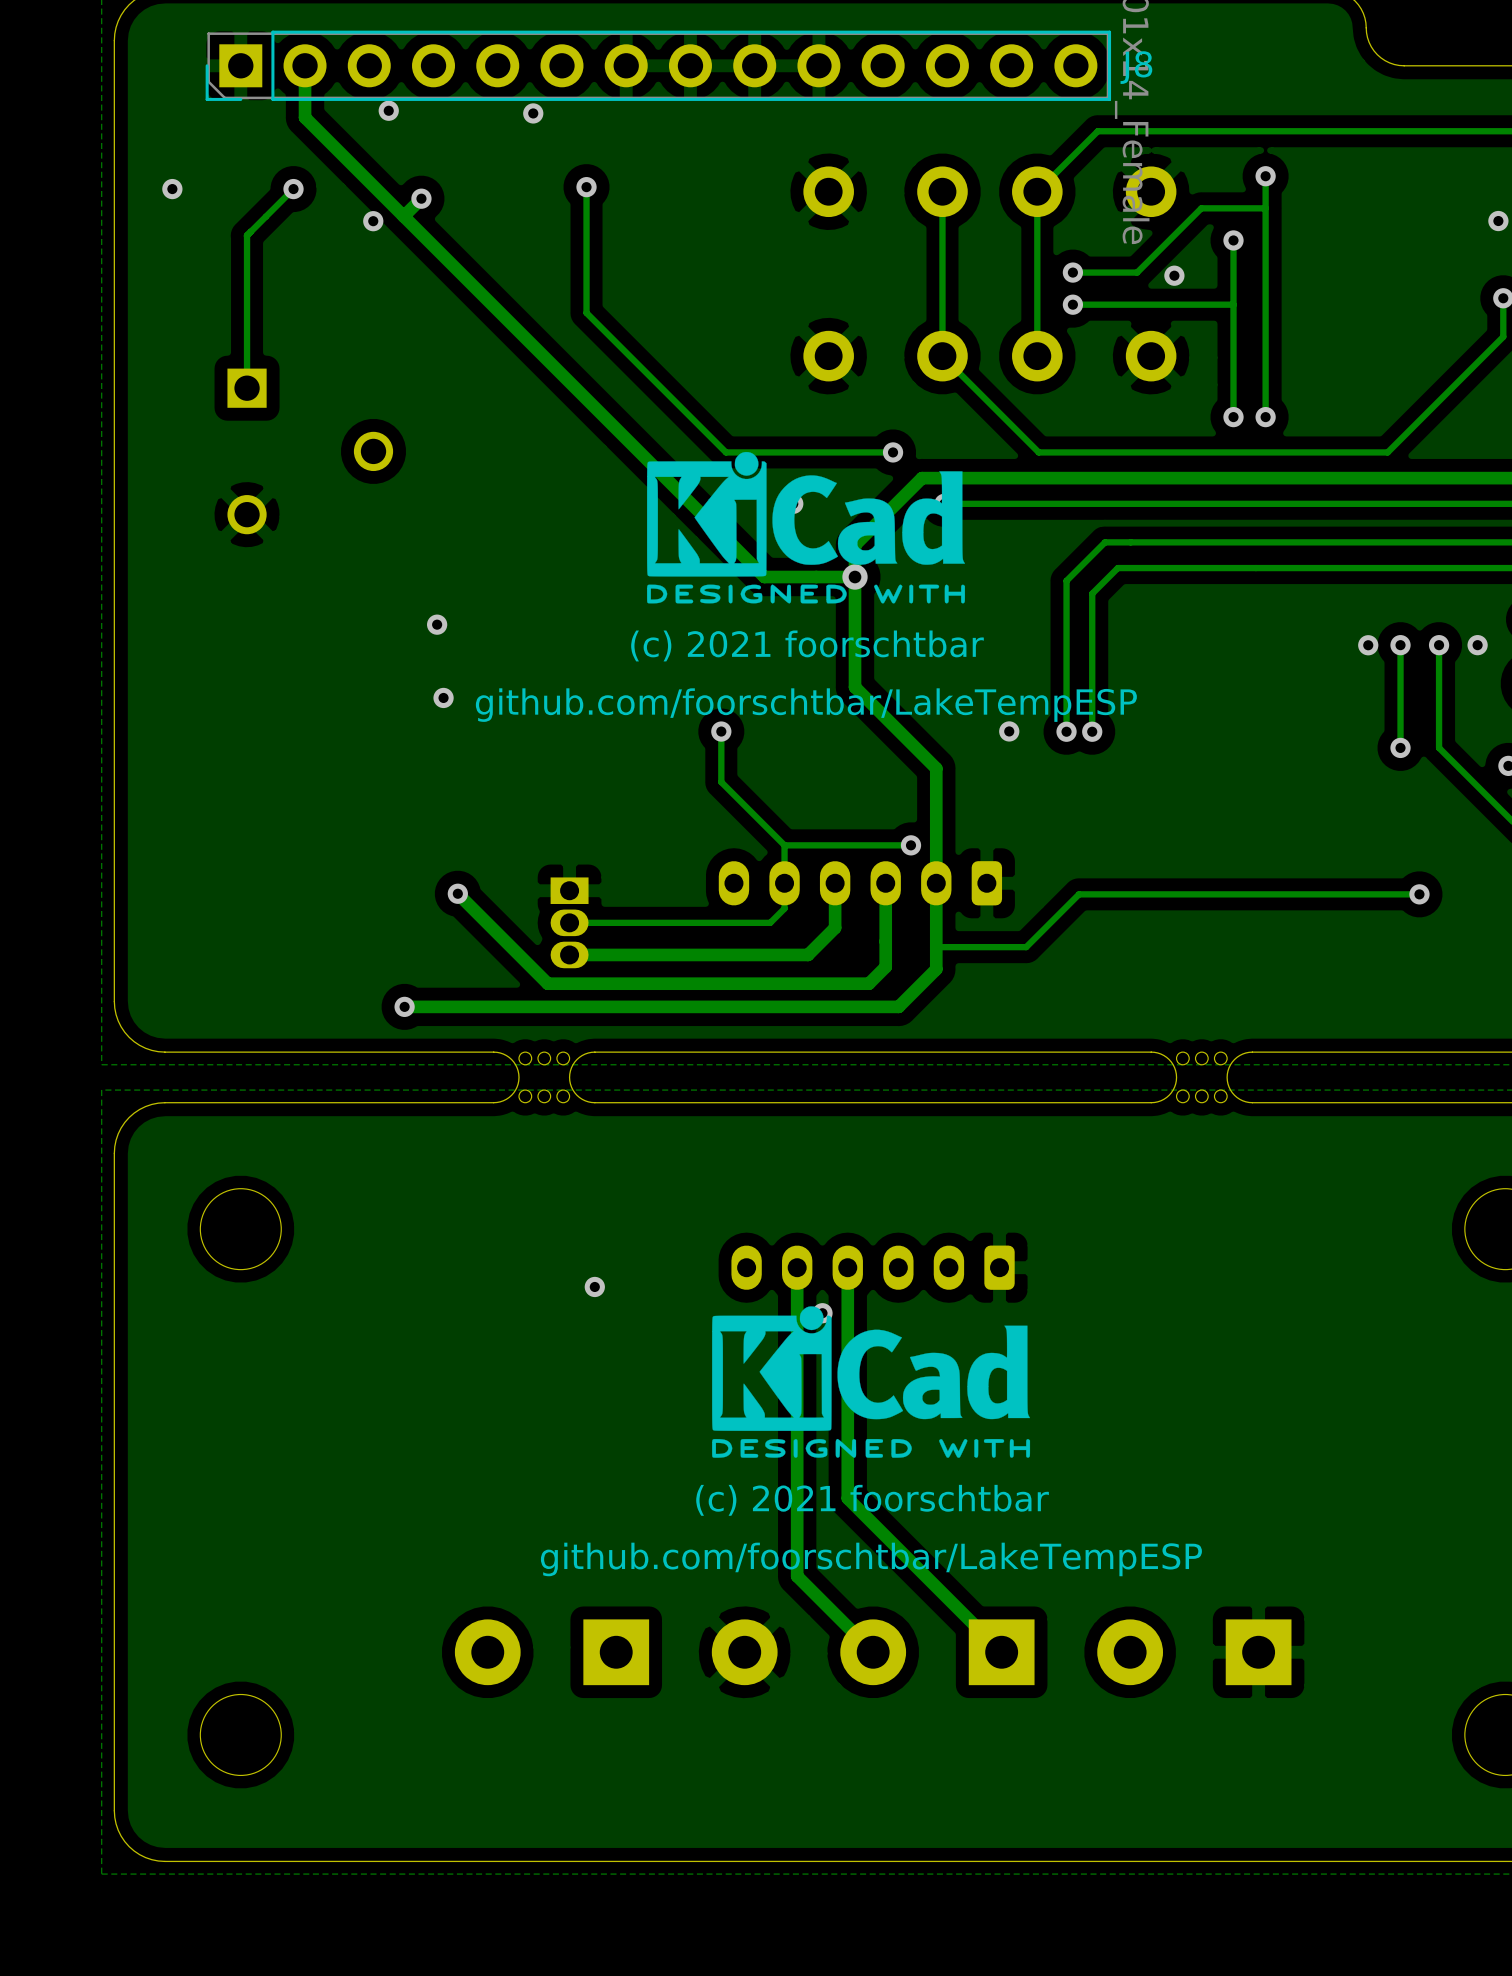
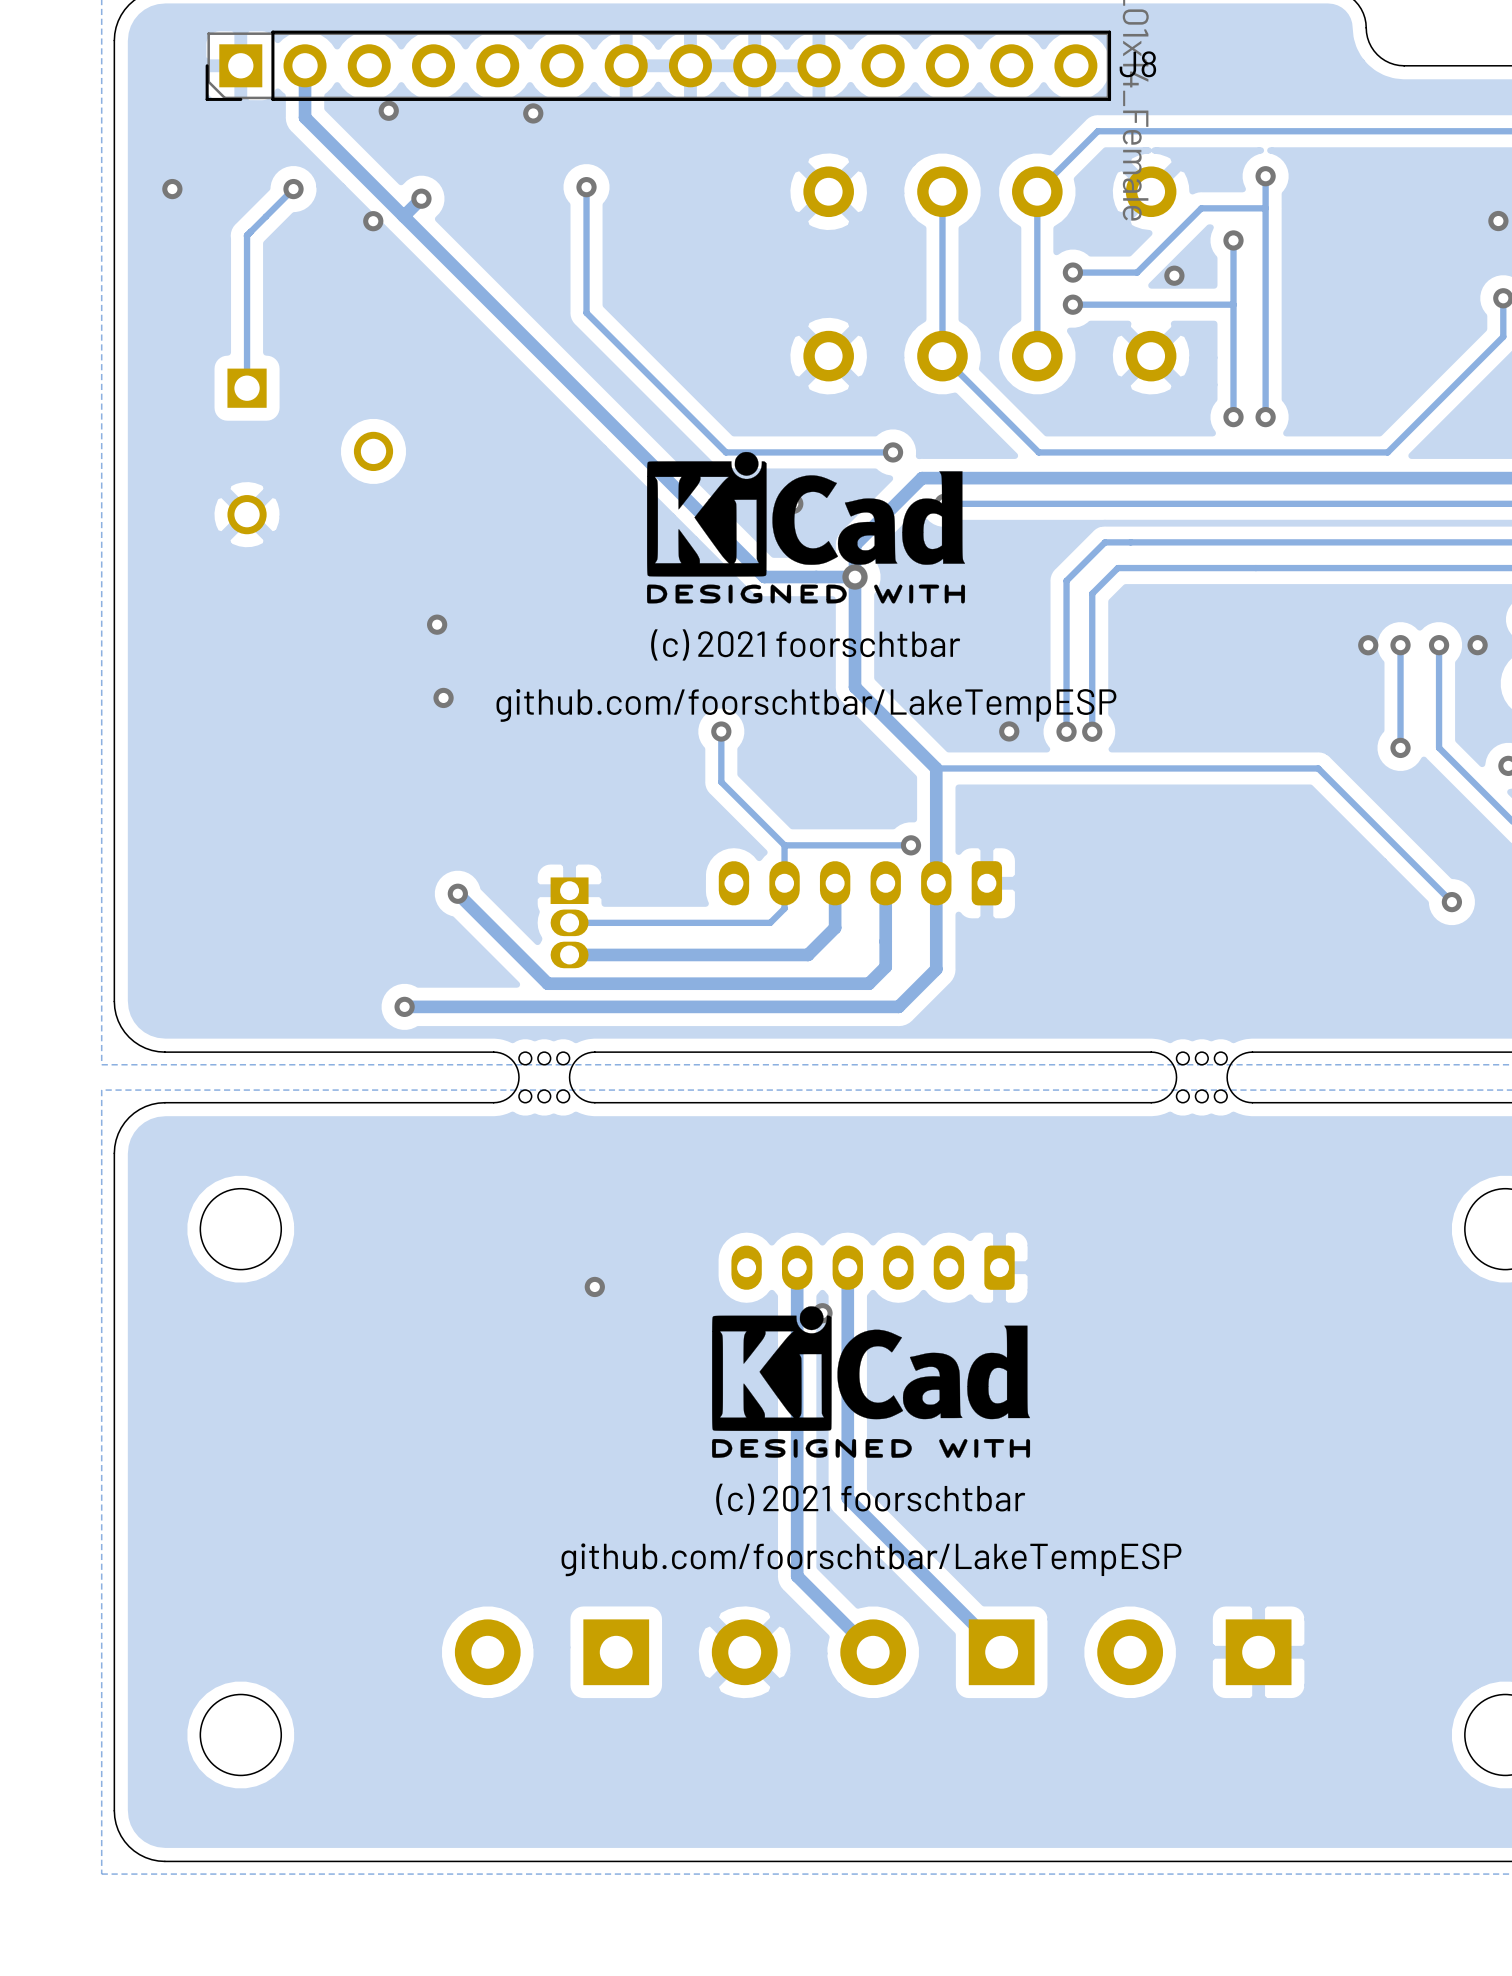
track: none -> (936, 768) (1318, 768) (1451, 902)
track: (1419, 894) (1079, 894) (1026, 947) (936, 947) -> none
via position: (1419, 894) -> (1451, 902)

